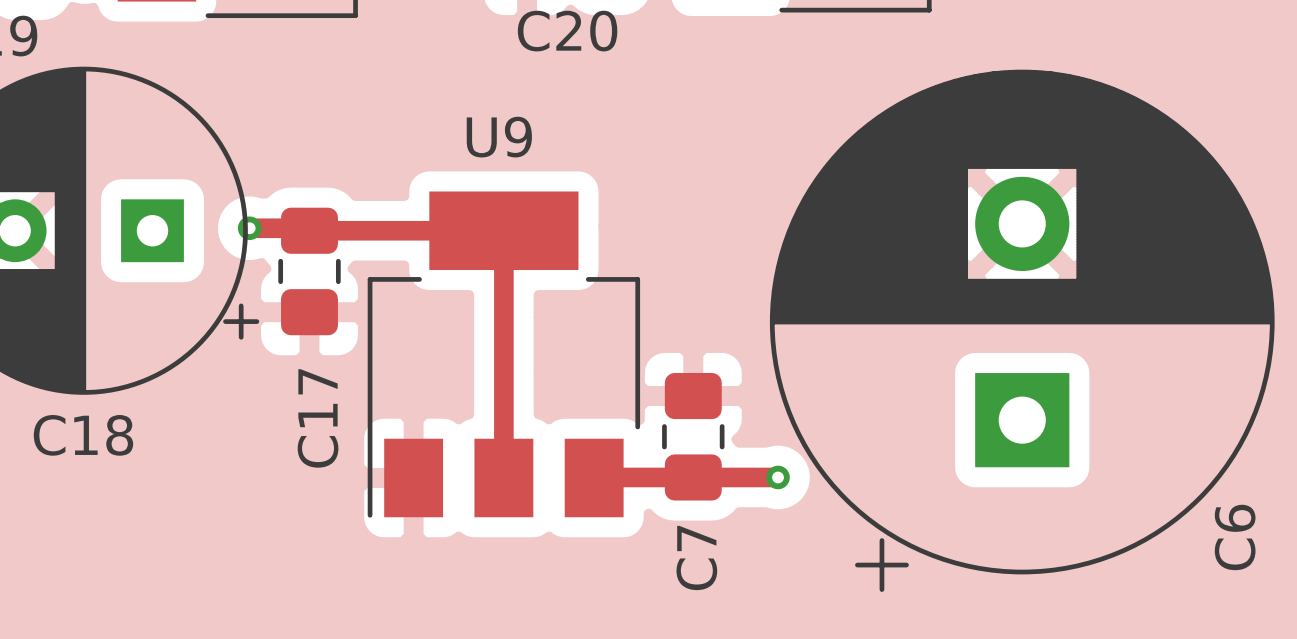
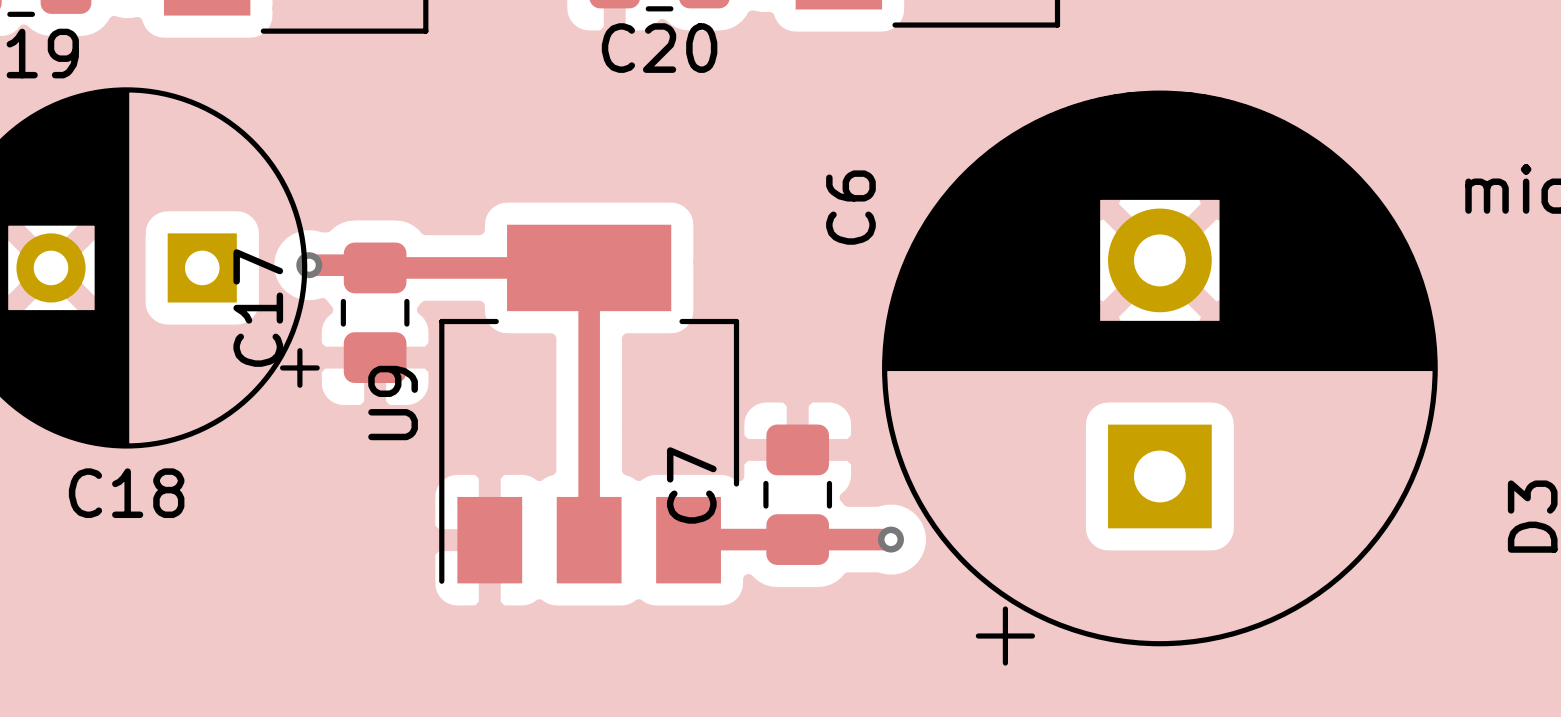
U9 name rotation: 0° (499, 137) -> 90° counterclockwise (393, 403)
U9 name position: U9 (499, 137) -> U9 (393, 403)
C17 name position: C17 (318, 418) -> C17 (258, 308)
C6 name position: C6 (1235, 537) -> C6 (850, 207)
C7 name position: C7 (696, 558) -> C7 (691, 485)

